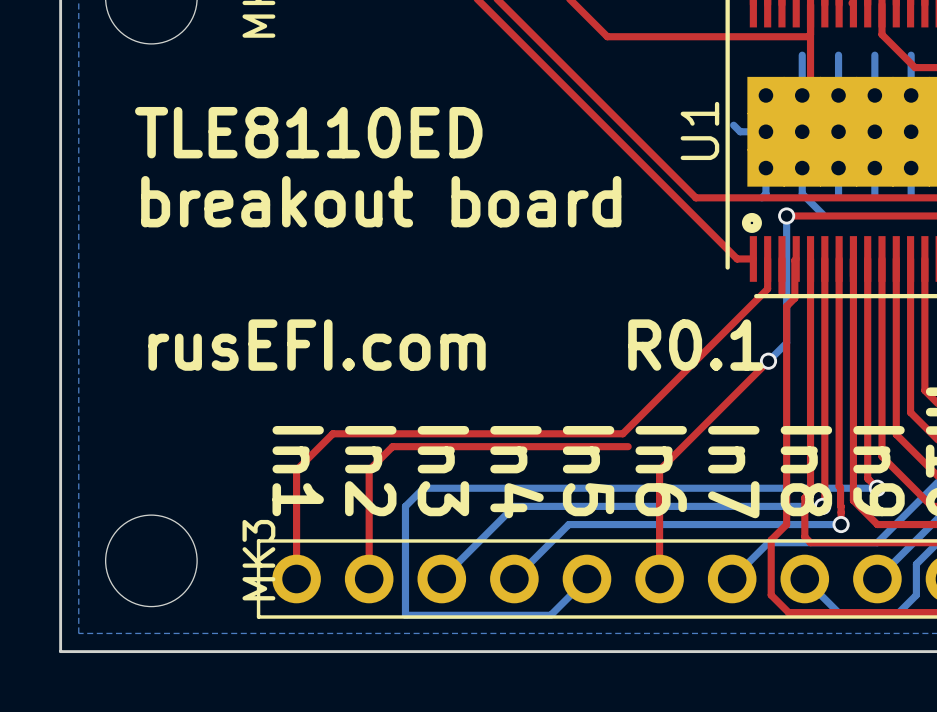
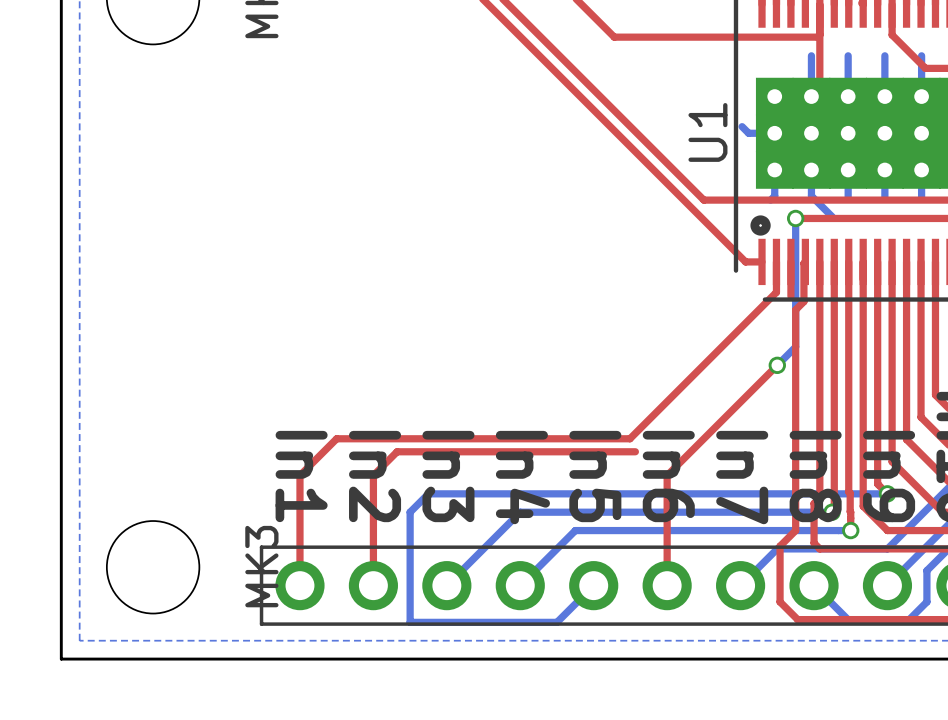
text: TLE8110ED (308, 132) -> none
text: breakout board (381, 201) -> none
text: rusEFI.com R0.1 (455, 345) -> none

